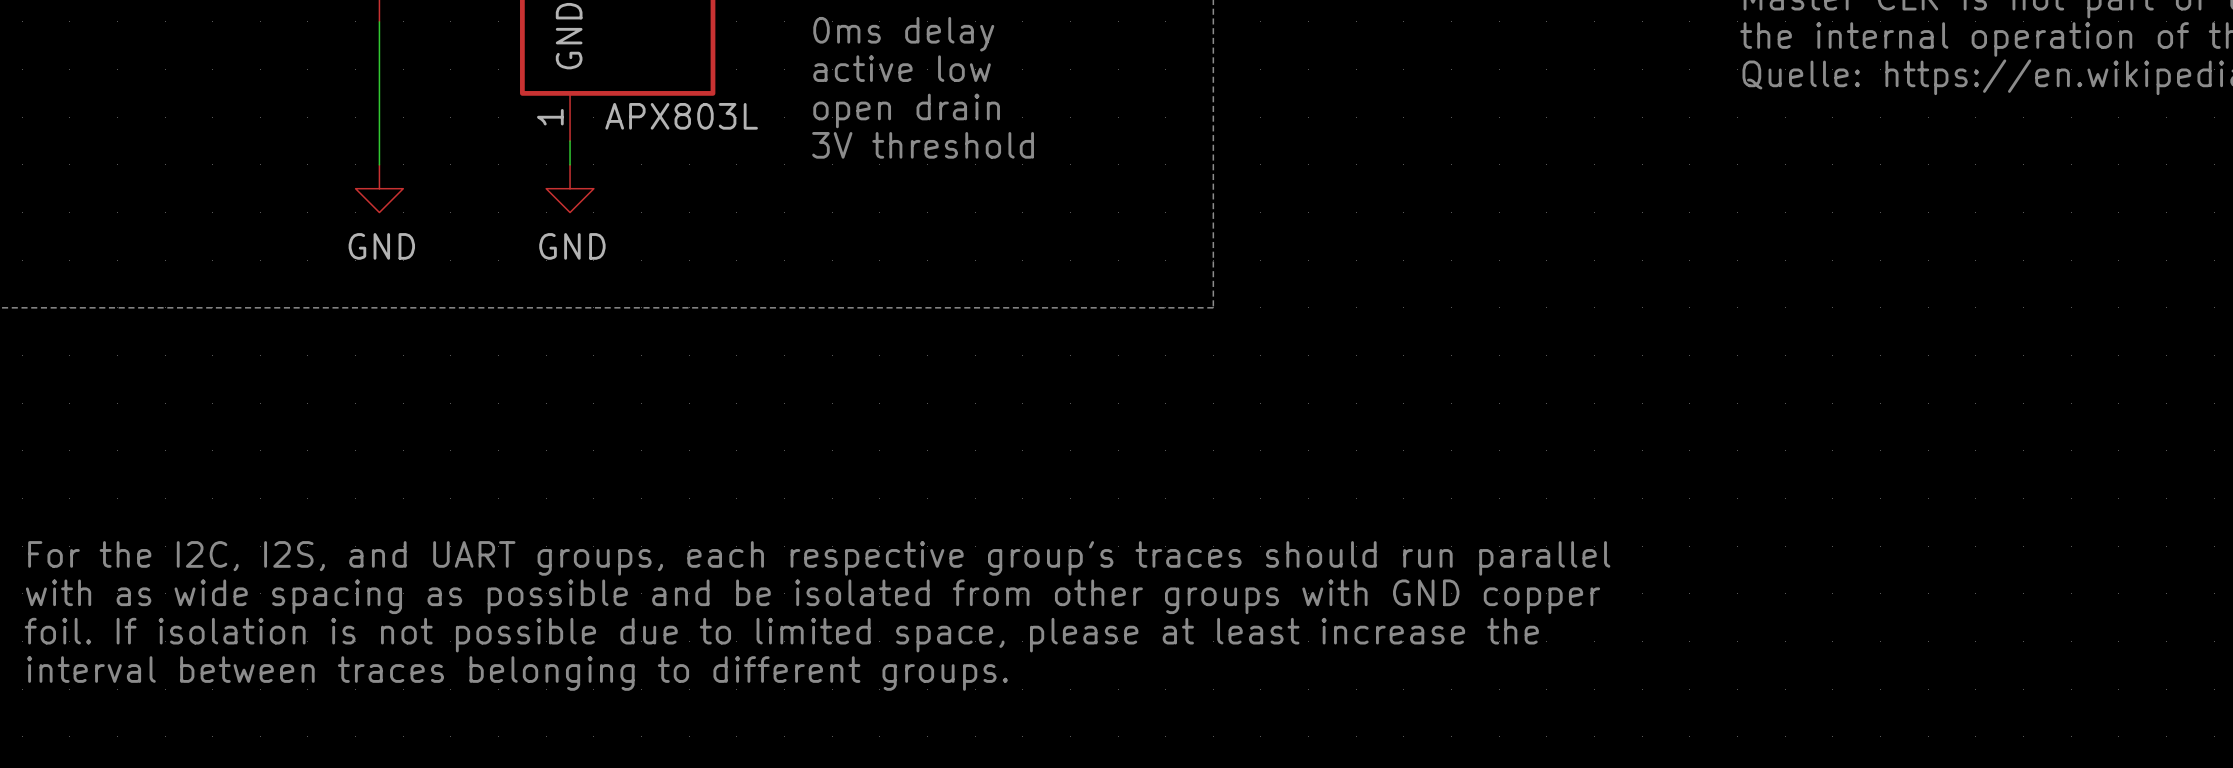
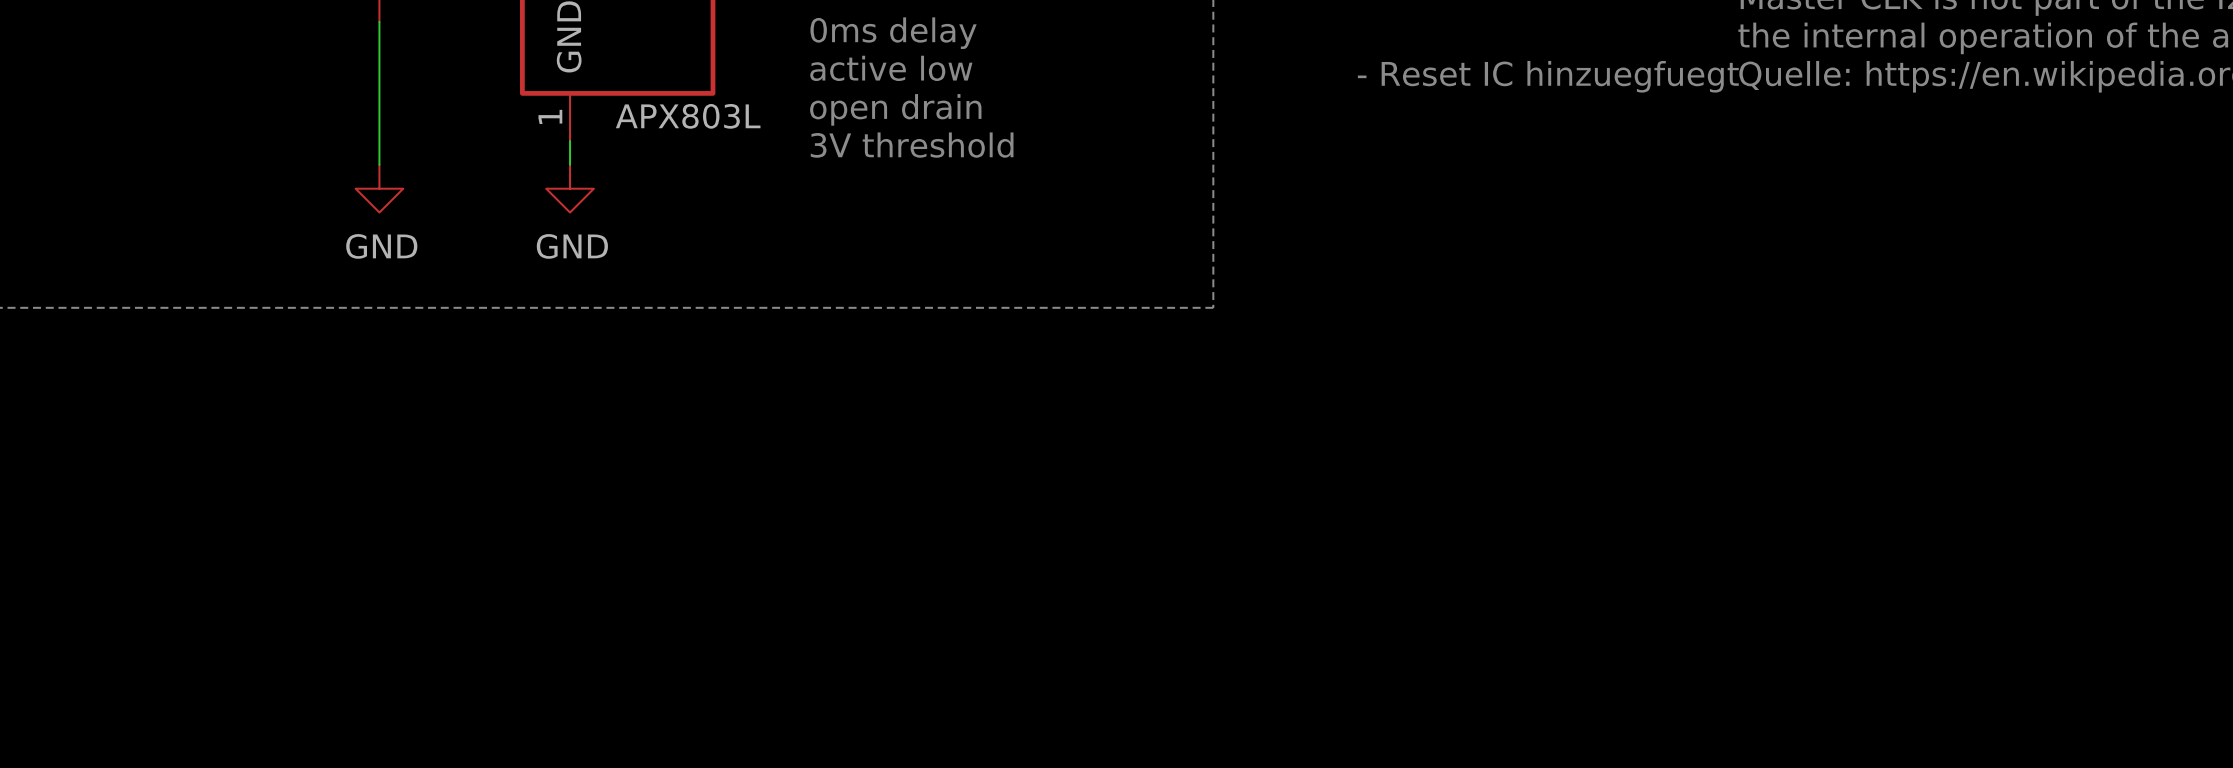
text: none -> - Reset IC hinzuegfuegt (1548, 76)
text: For the I2C, I2S, and UART groups, each respective group's traces should run parallel (819, 558) -> none
text: with as wide spacing as possible and be isolated from other groups with GND copper (813, 596) -> none
text: foil. If isolation is not possible due to limited space, please at least increase the (781, 635) -> none
text: interval between traces belonging to different groups. (517, 673) -> none

